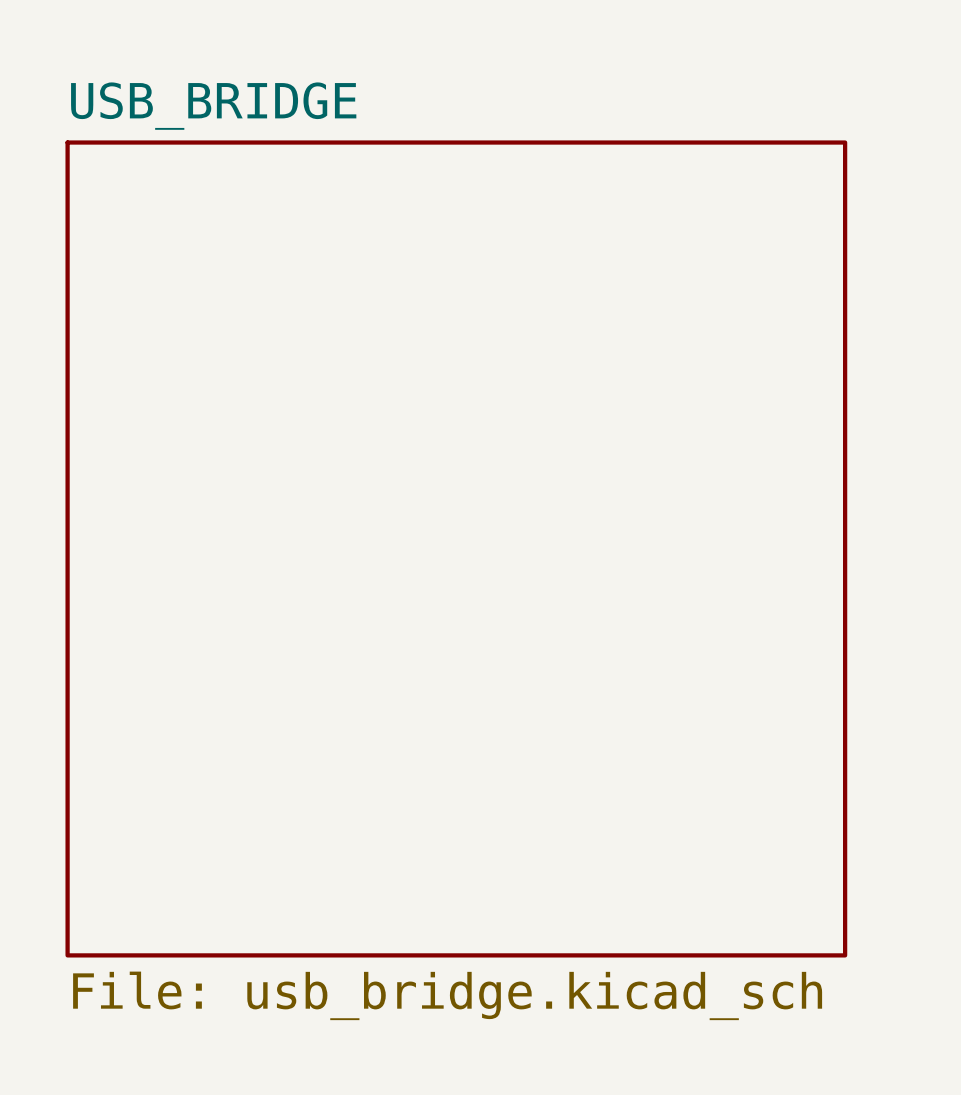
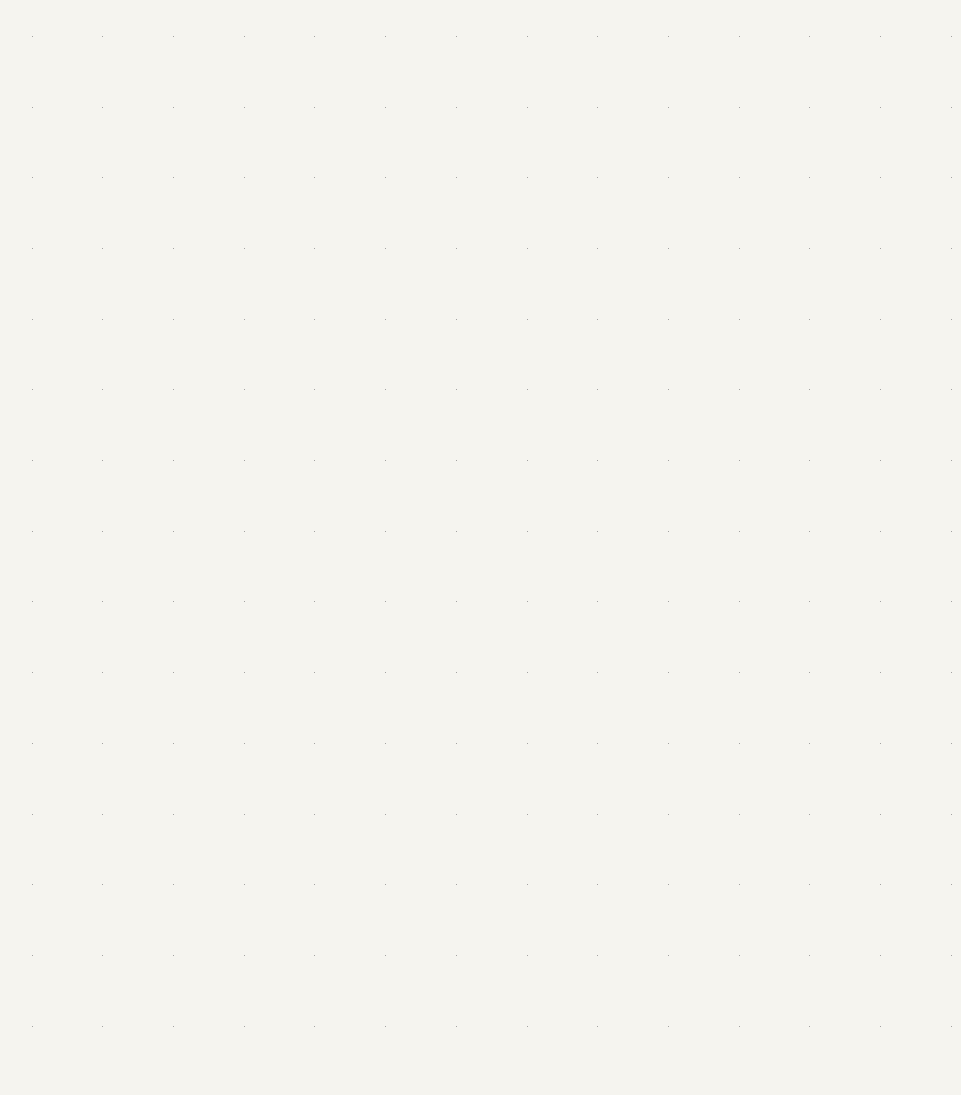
sheet USB_BRIDGE: File: usb_bridge.kicad_sch (456, 548) -> none

